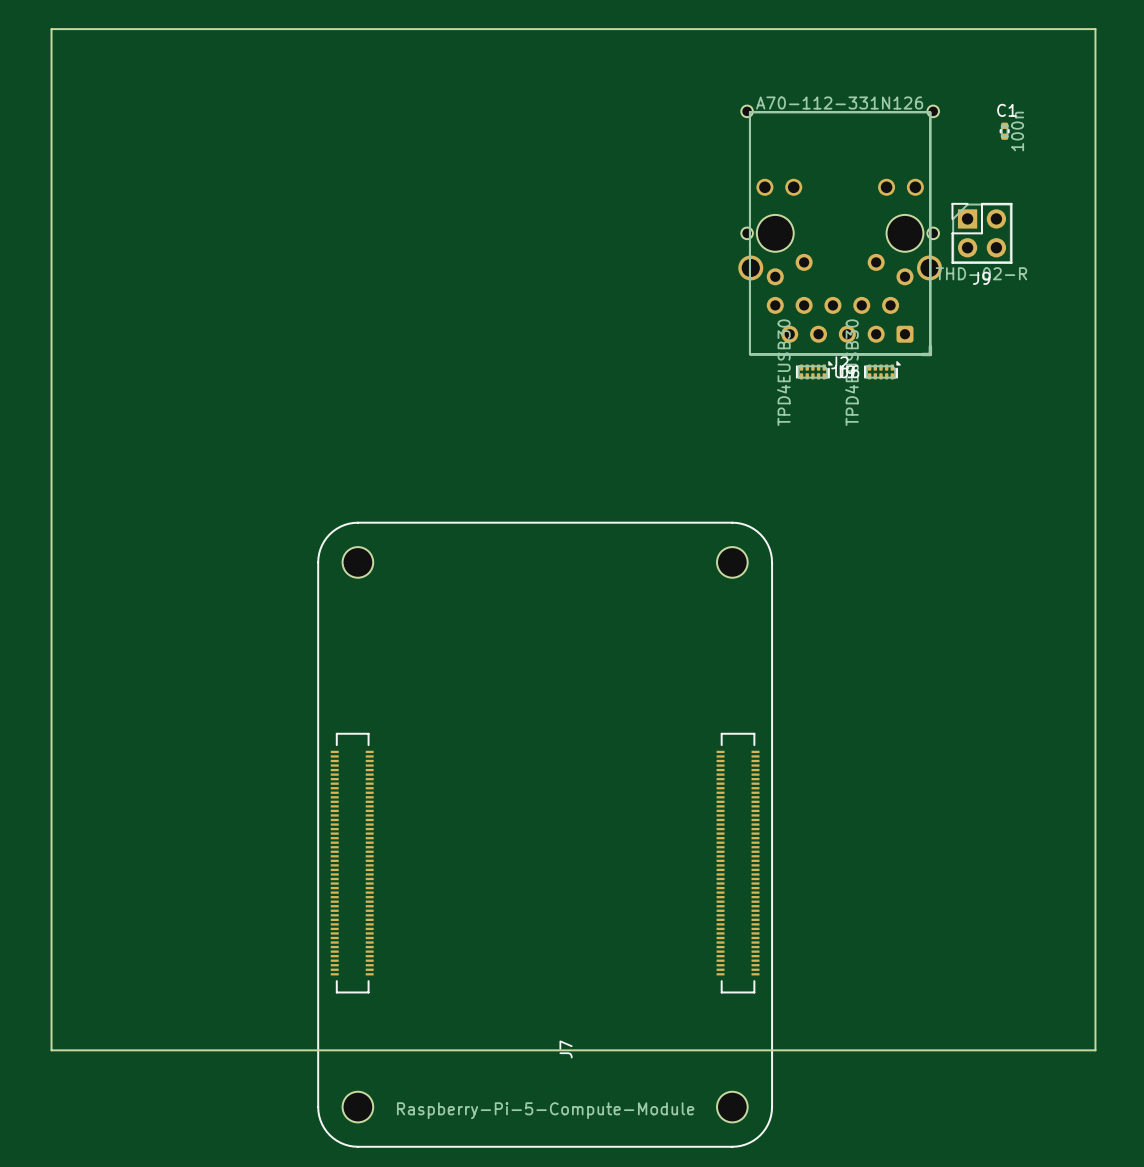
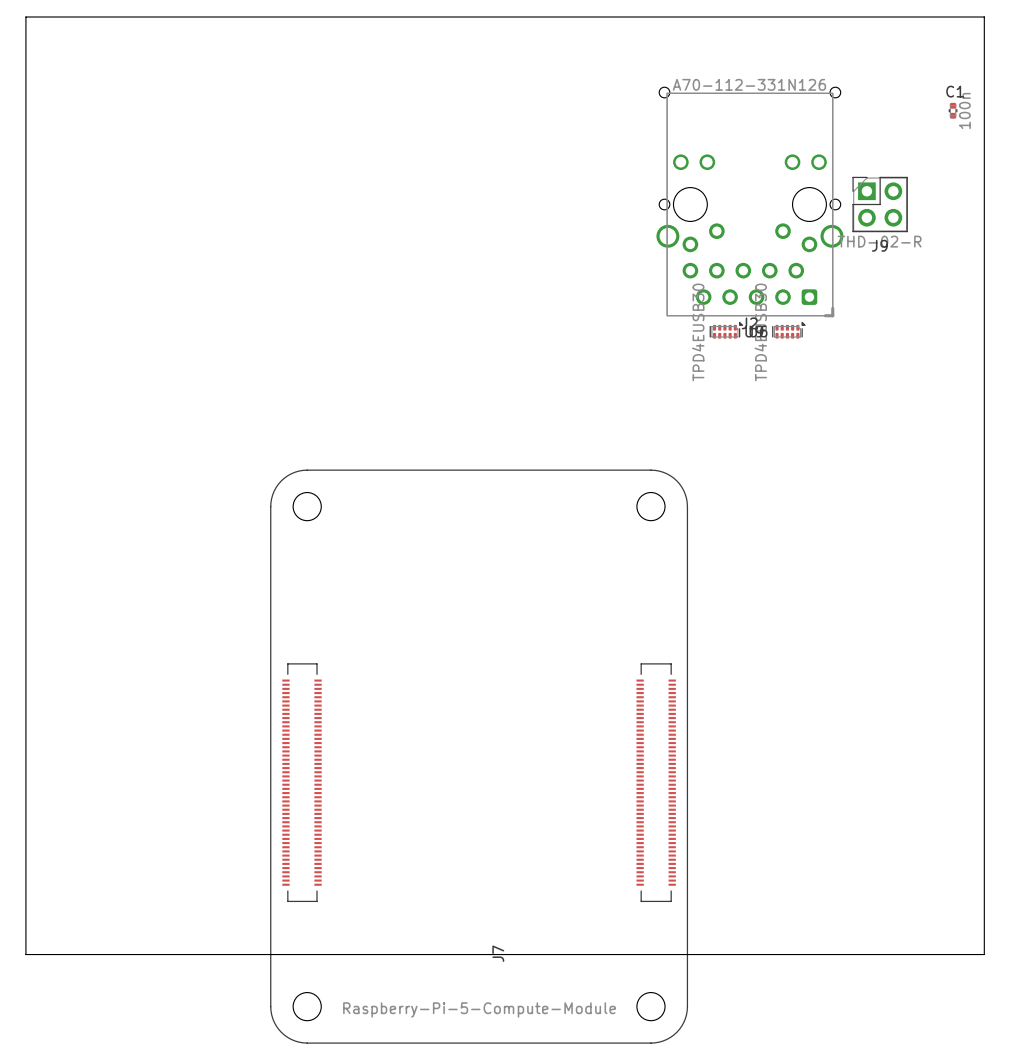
C1 position: (1004, 131) -> (953, 110)

